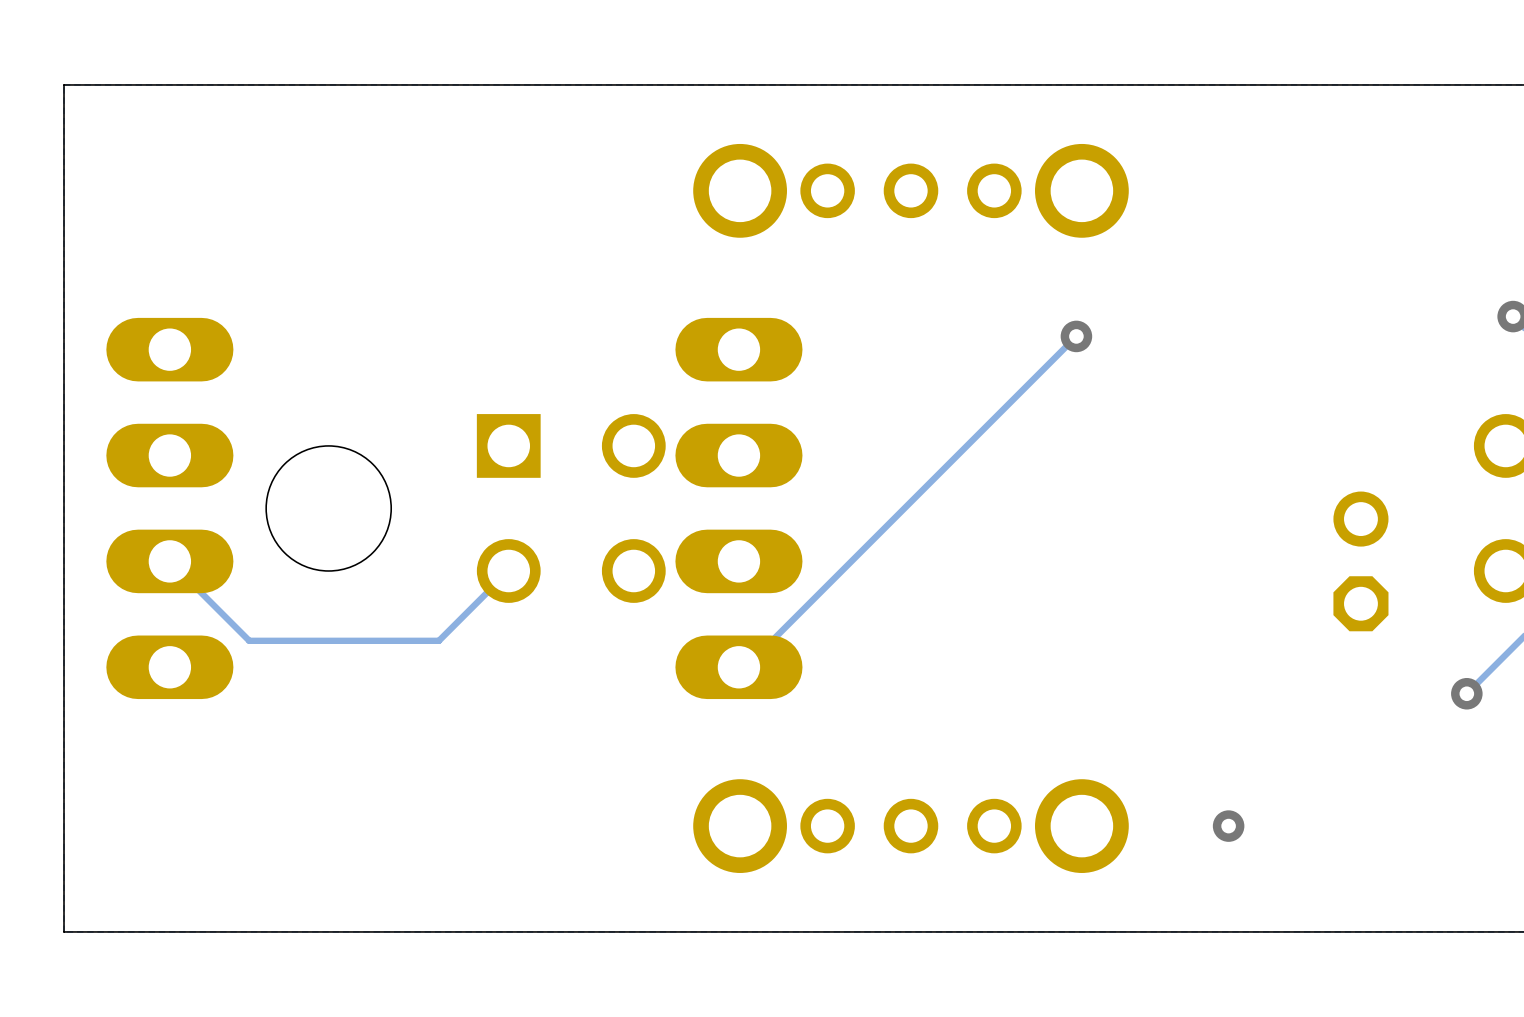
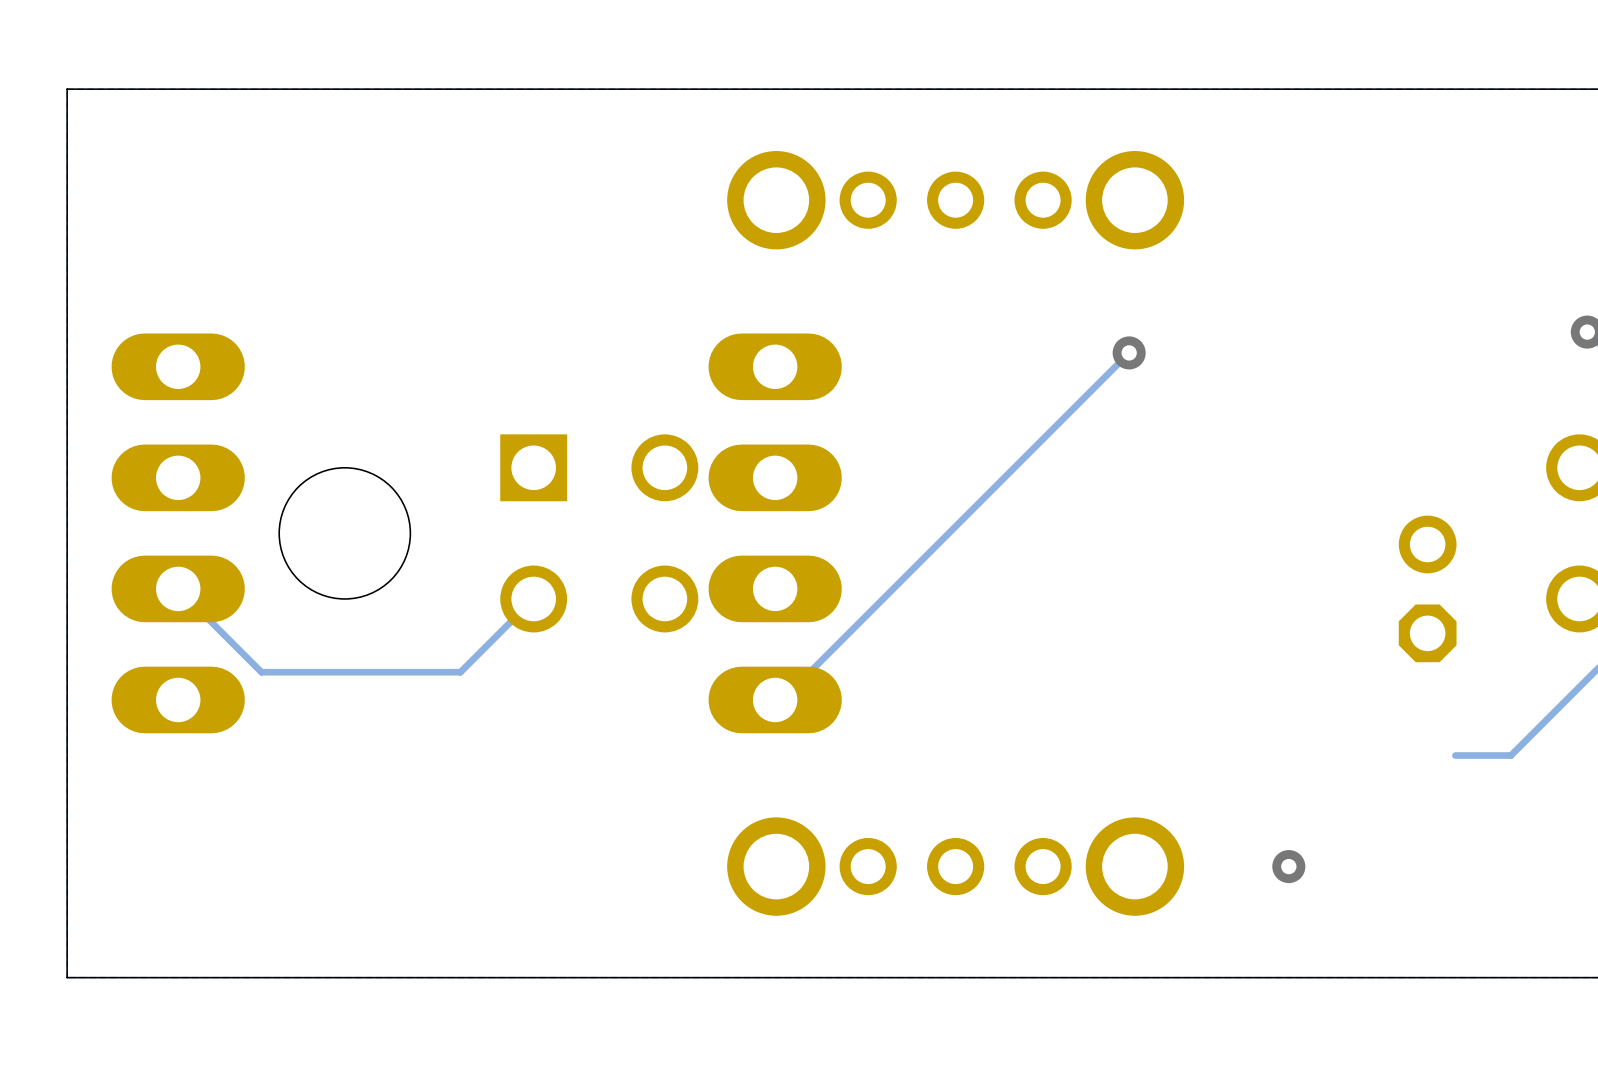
track: none -> (1538, 727) (1510, 755) (1455, 755)
via: (1466, 693) -> none

